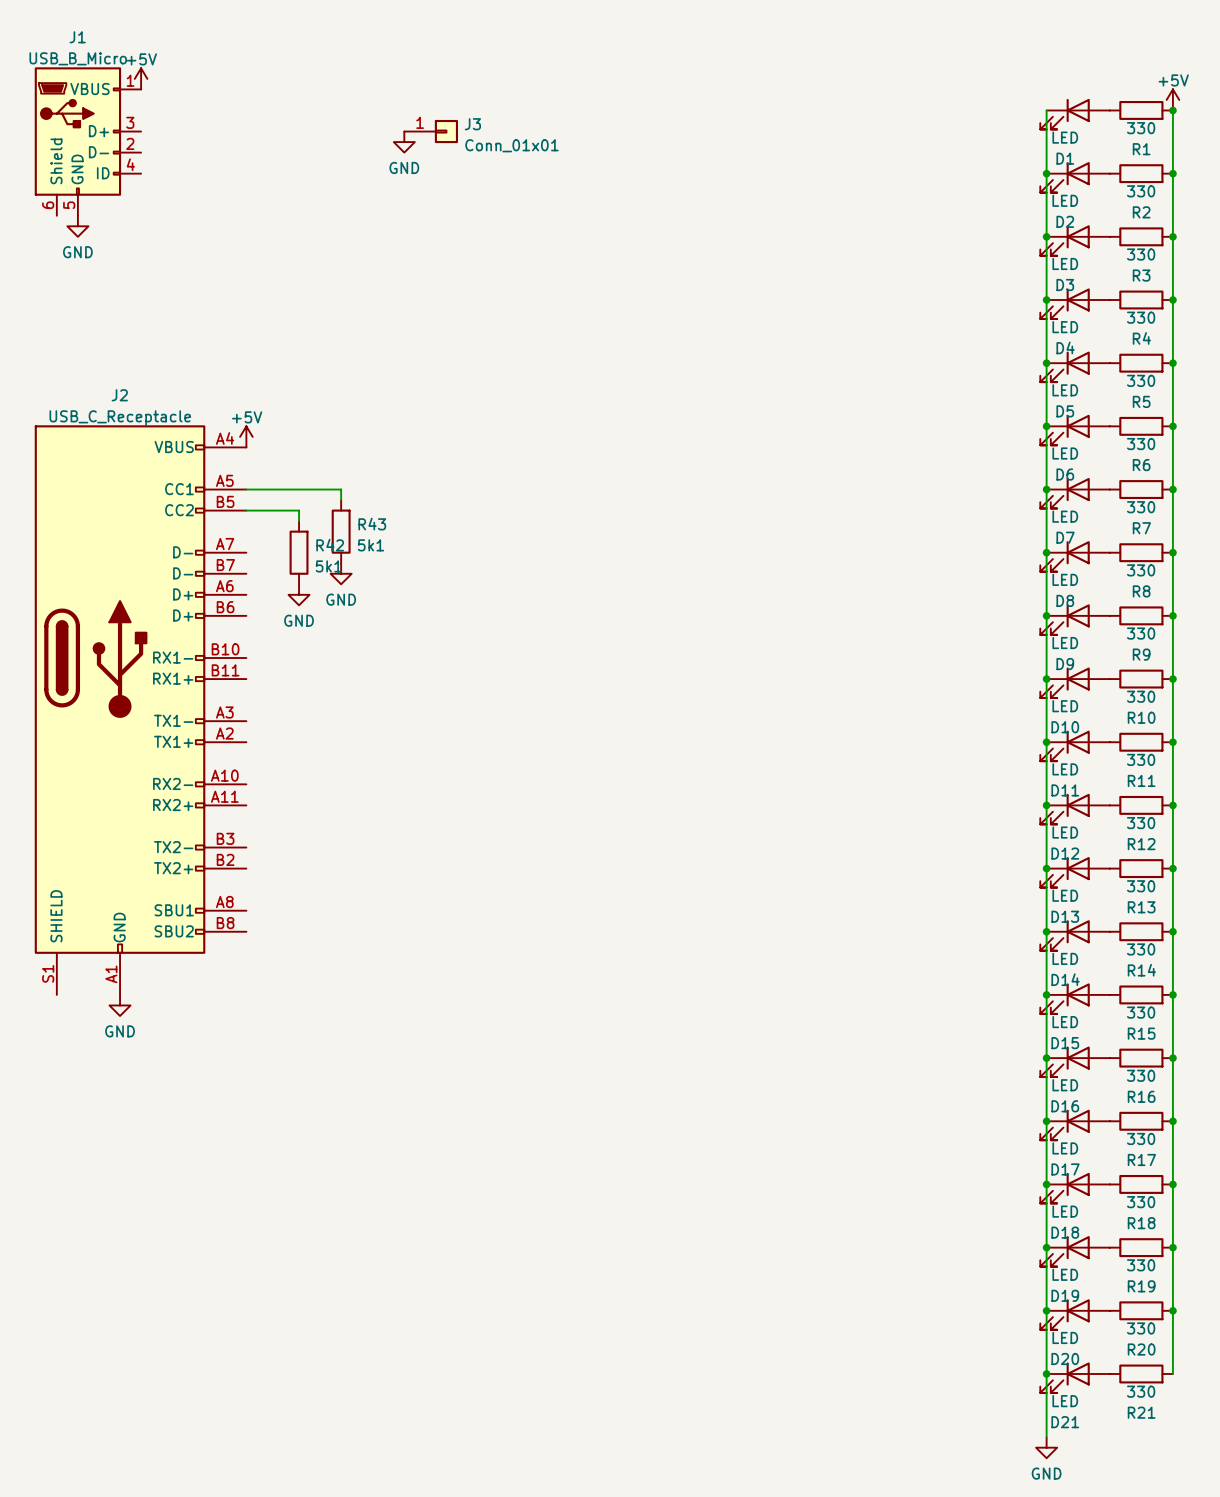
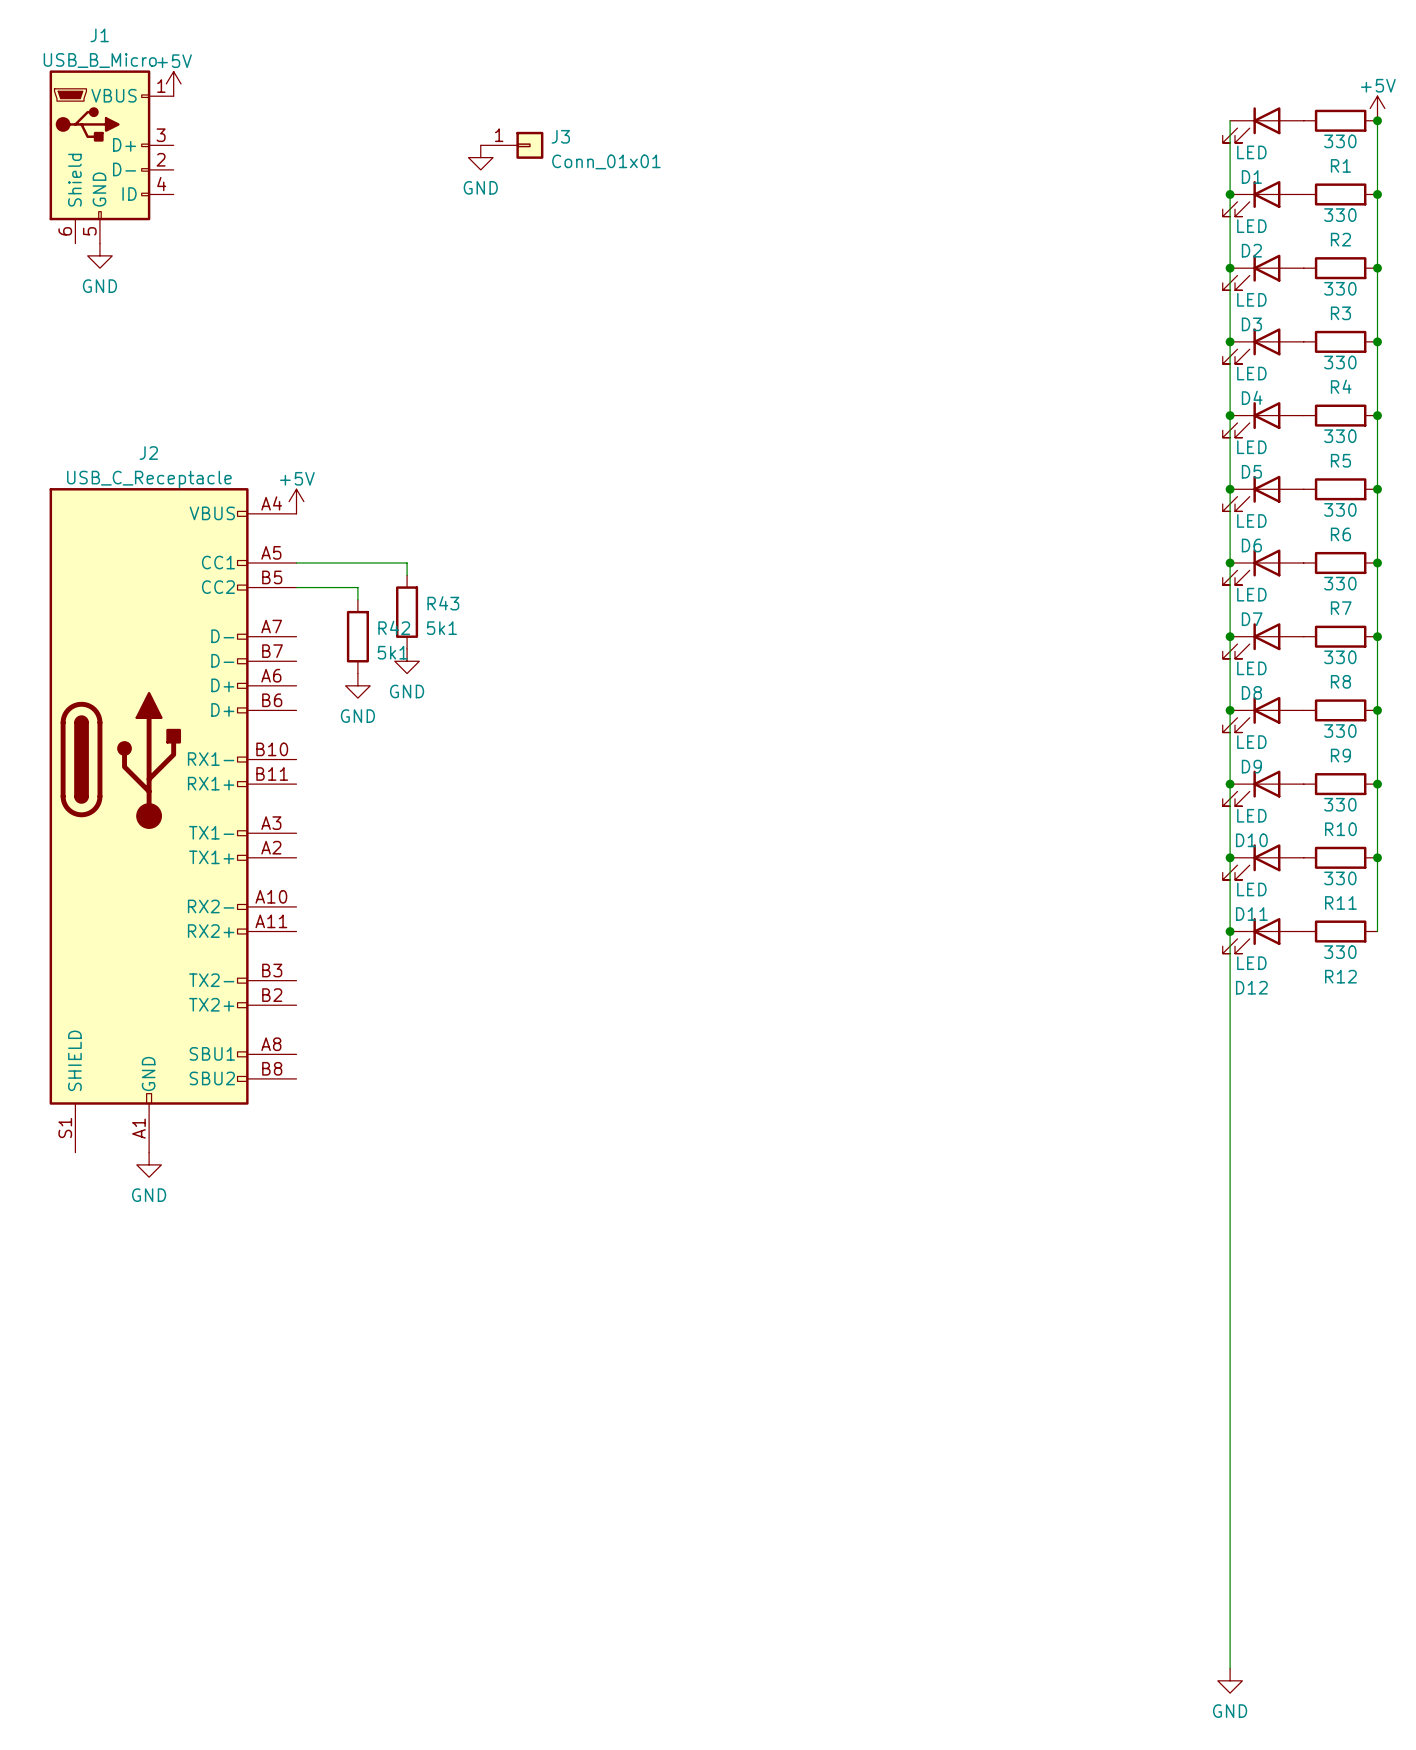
wire: (1172, 805) (1172, 1373) -> none
junction: (1172, 805) -> none
junction: (1046, 868) -> none
R13: 330 (1141, 868) -> none
junction: (1172, 868) -> none
D13: LED (1075, 872) -> none
junction: (1046, 931) -> none
R14: 330 (1141, 931) -> none
junction: (1172, 931) -> none
D14: LED (1075, 935) -> none
junction: (1046, 994) -> none
R15: 330 (1141, 994) -> none
junction: (1172, 994) -> none
D15: LED (1075, 998) -> none
junction: (1046, 1058) -> none
R16: 330 (1141, 1058) -> none
junction: (1172, 1058) -> none
D16: LED (1075, 1061) -> none
junction: (1046, 1121) -> none
R17: 330 (1141, 1121) -> none
junction: (1172, 1121) -> none
D17: LED (1075, 1124) -> none
junction: (1046, 1184) -> none
R18: 330 (1141, 1184) -> none
junction: (1172, 1184) -> none
D18: LED (1075, 1188) -> none
junction: (1046, 1247) -> none
R19: 330 (1141, 1247) -> none
junction: (1172, 1247) -> none
D19: LED (1075, 1251) -> none
junction: (1046, 1310) -> none
R20: 330 (1141, 1310) -> none
junction: (1172, 1310) -> none
D20: LED (1075, 1314) -> none
junction: (1046, 1373) -> none
R21: 330 (1141, 1373) -> none
D21: LED (1075, 1377) -> none

